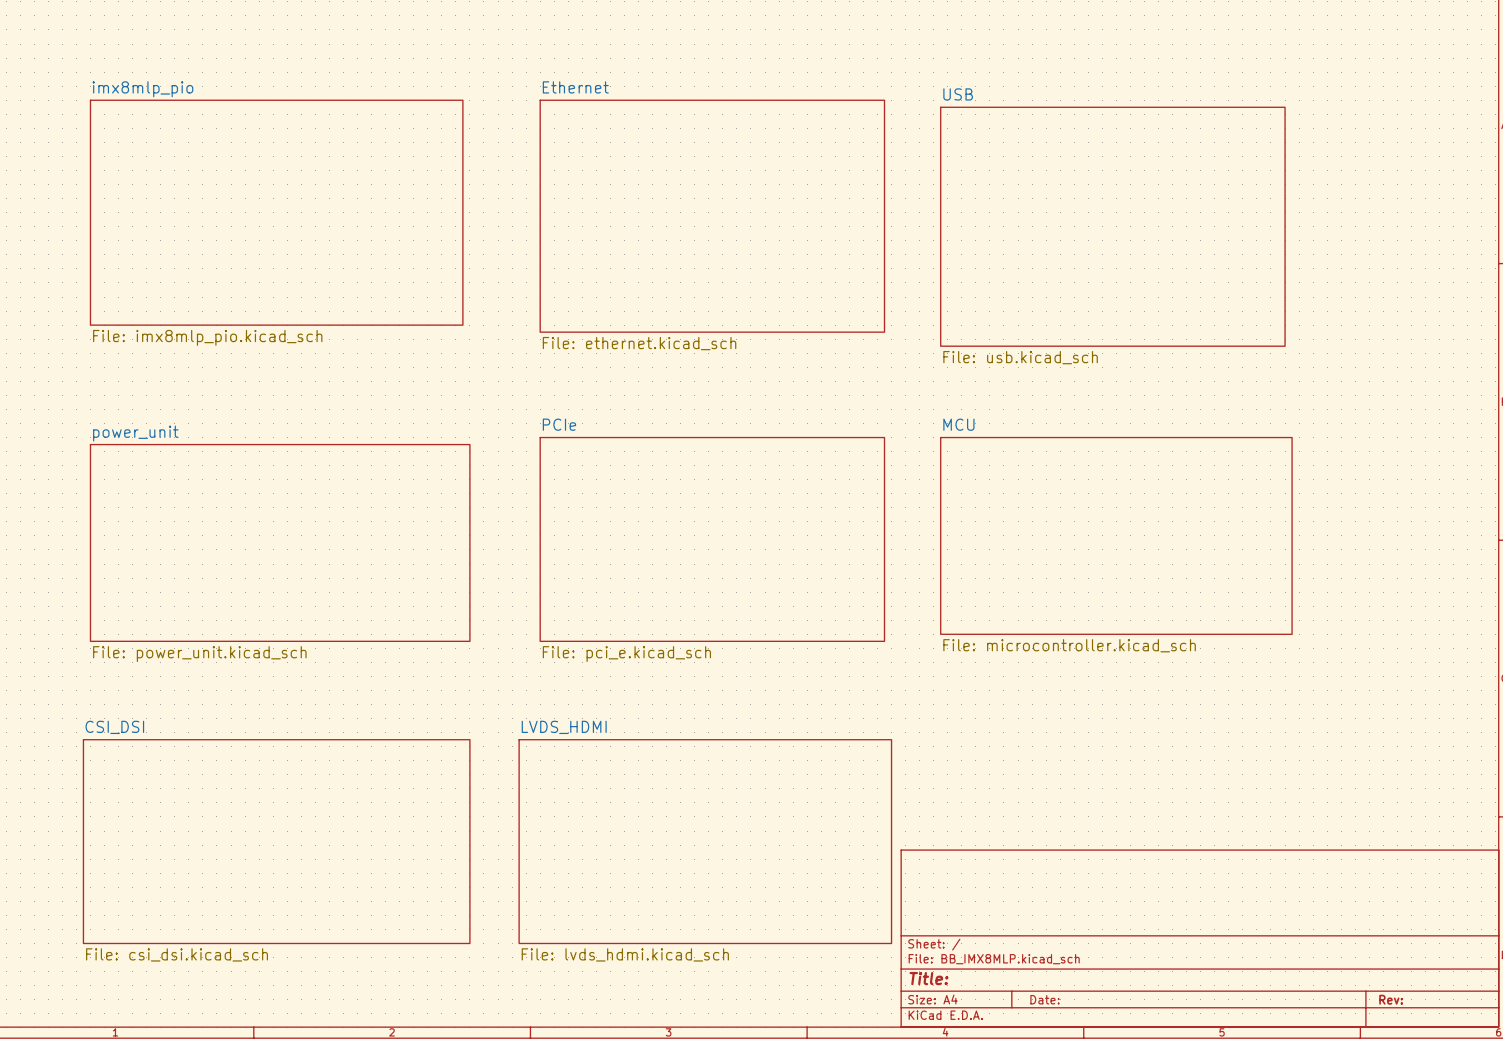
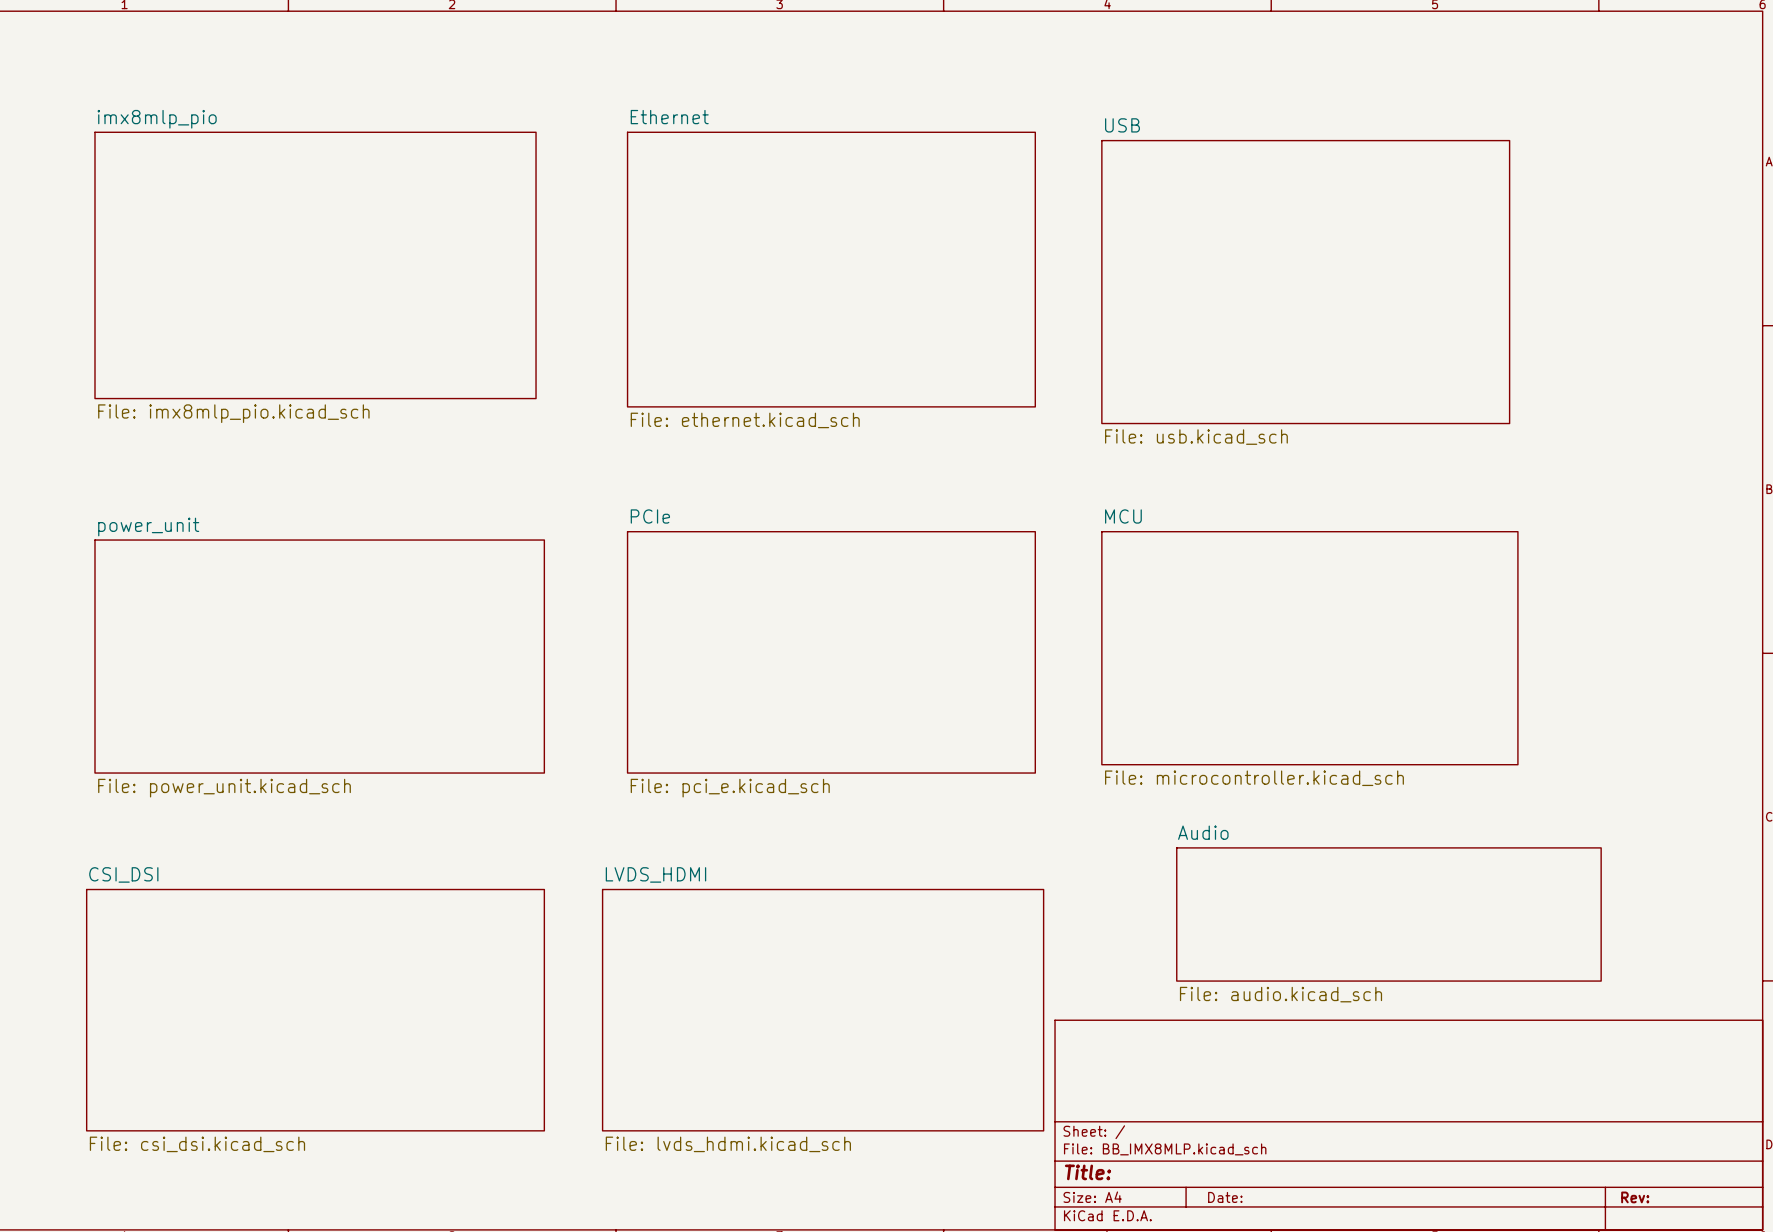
sheet Audio: none -> File: audio.kicad_sch (1388, 914)

